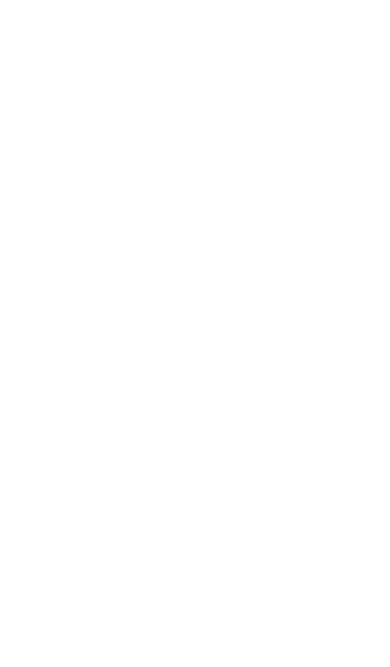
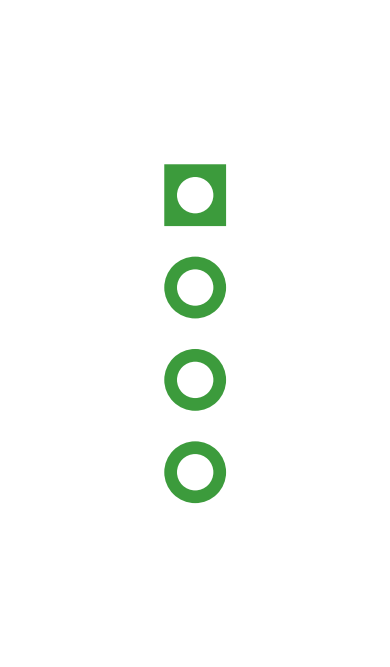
part: none -> (195, 333)

